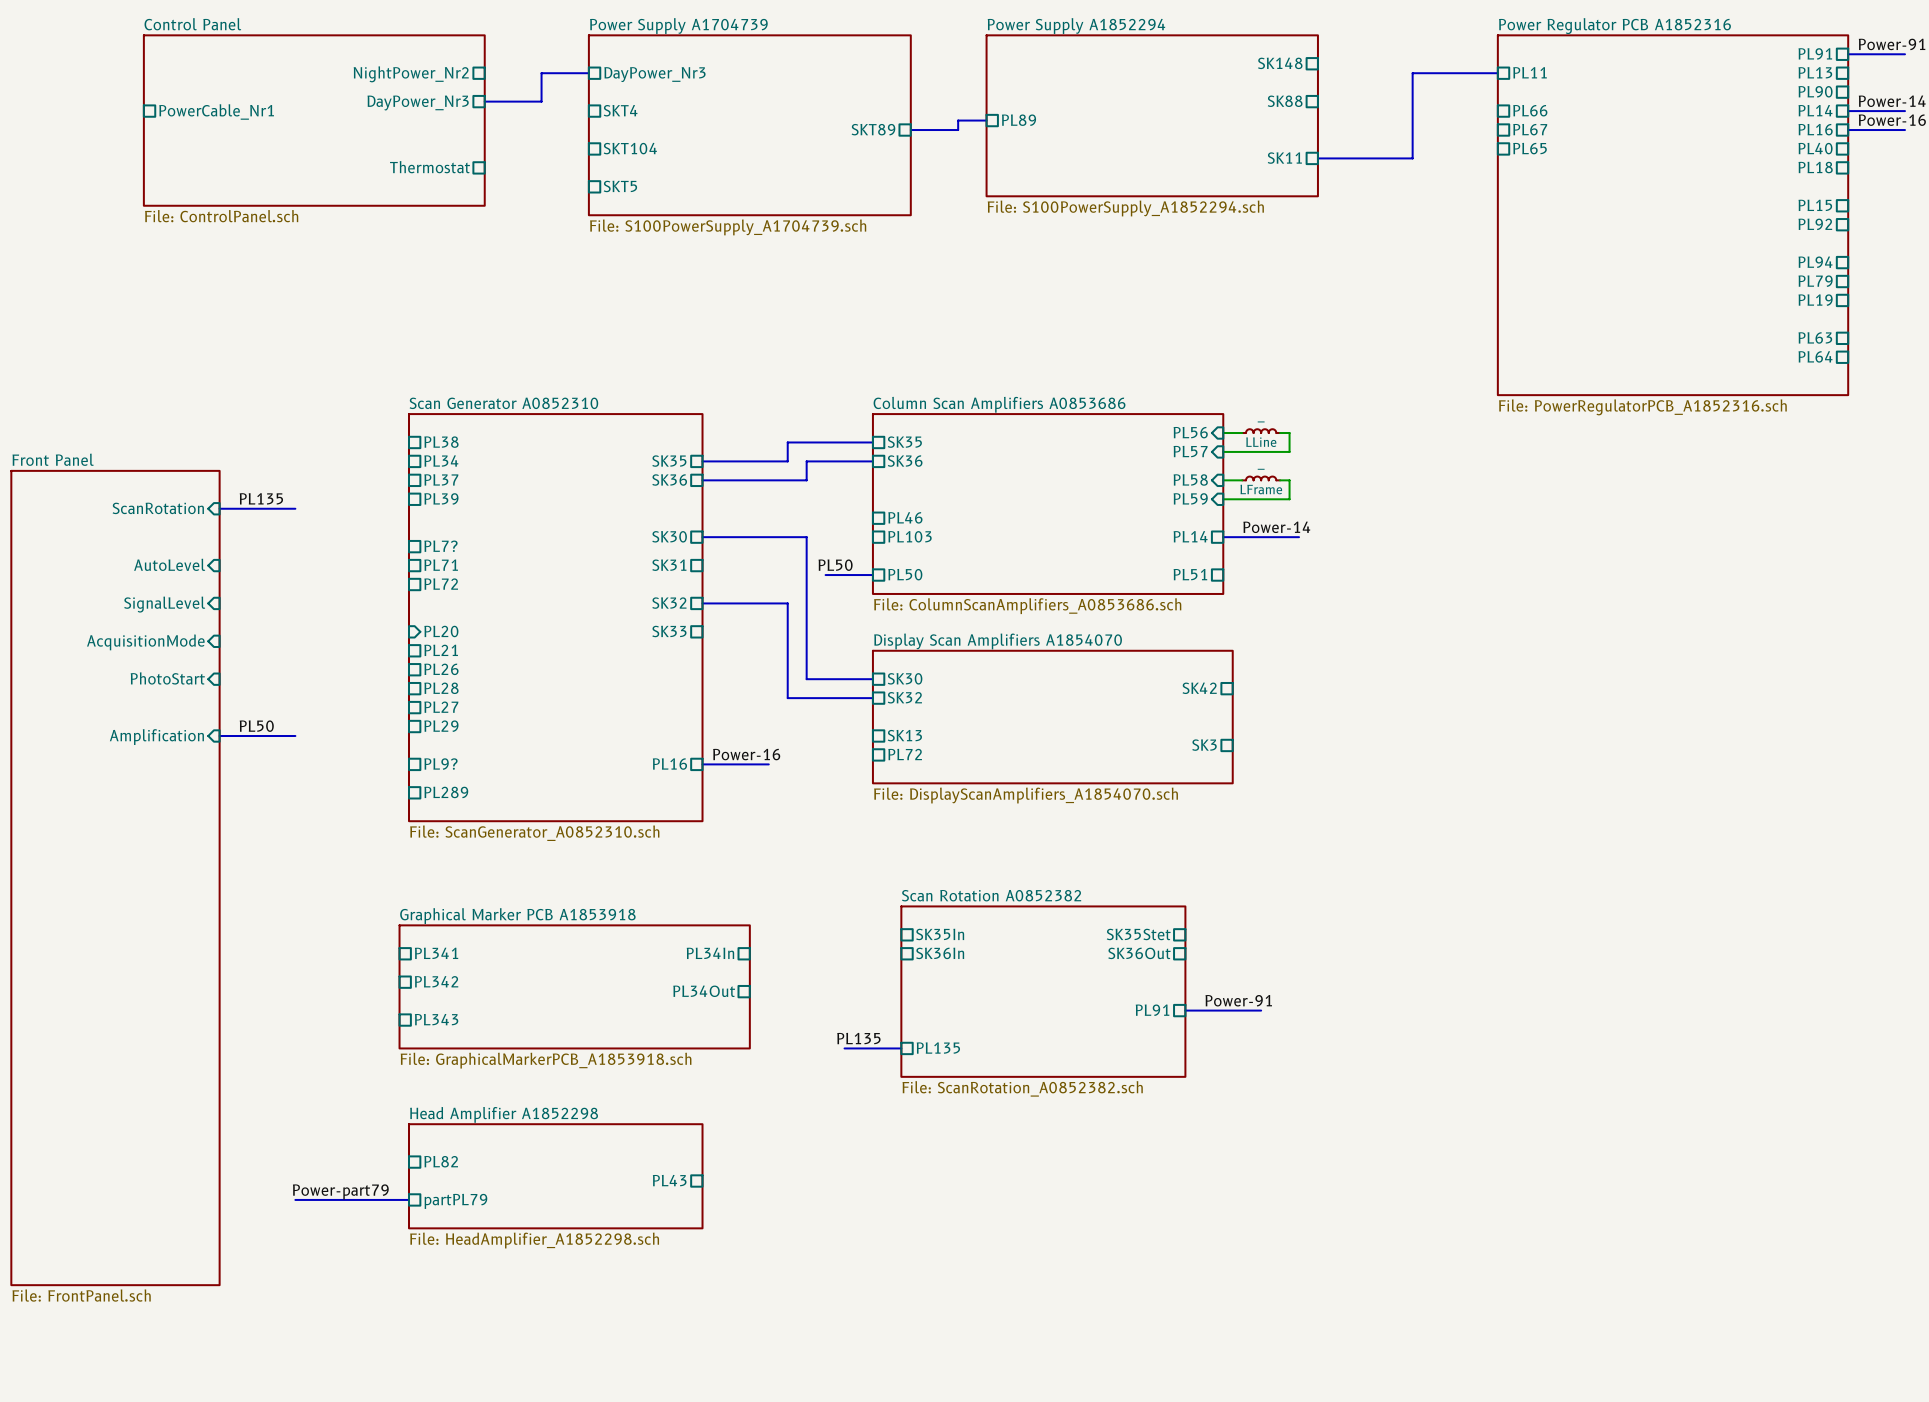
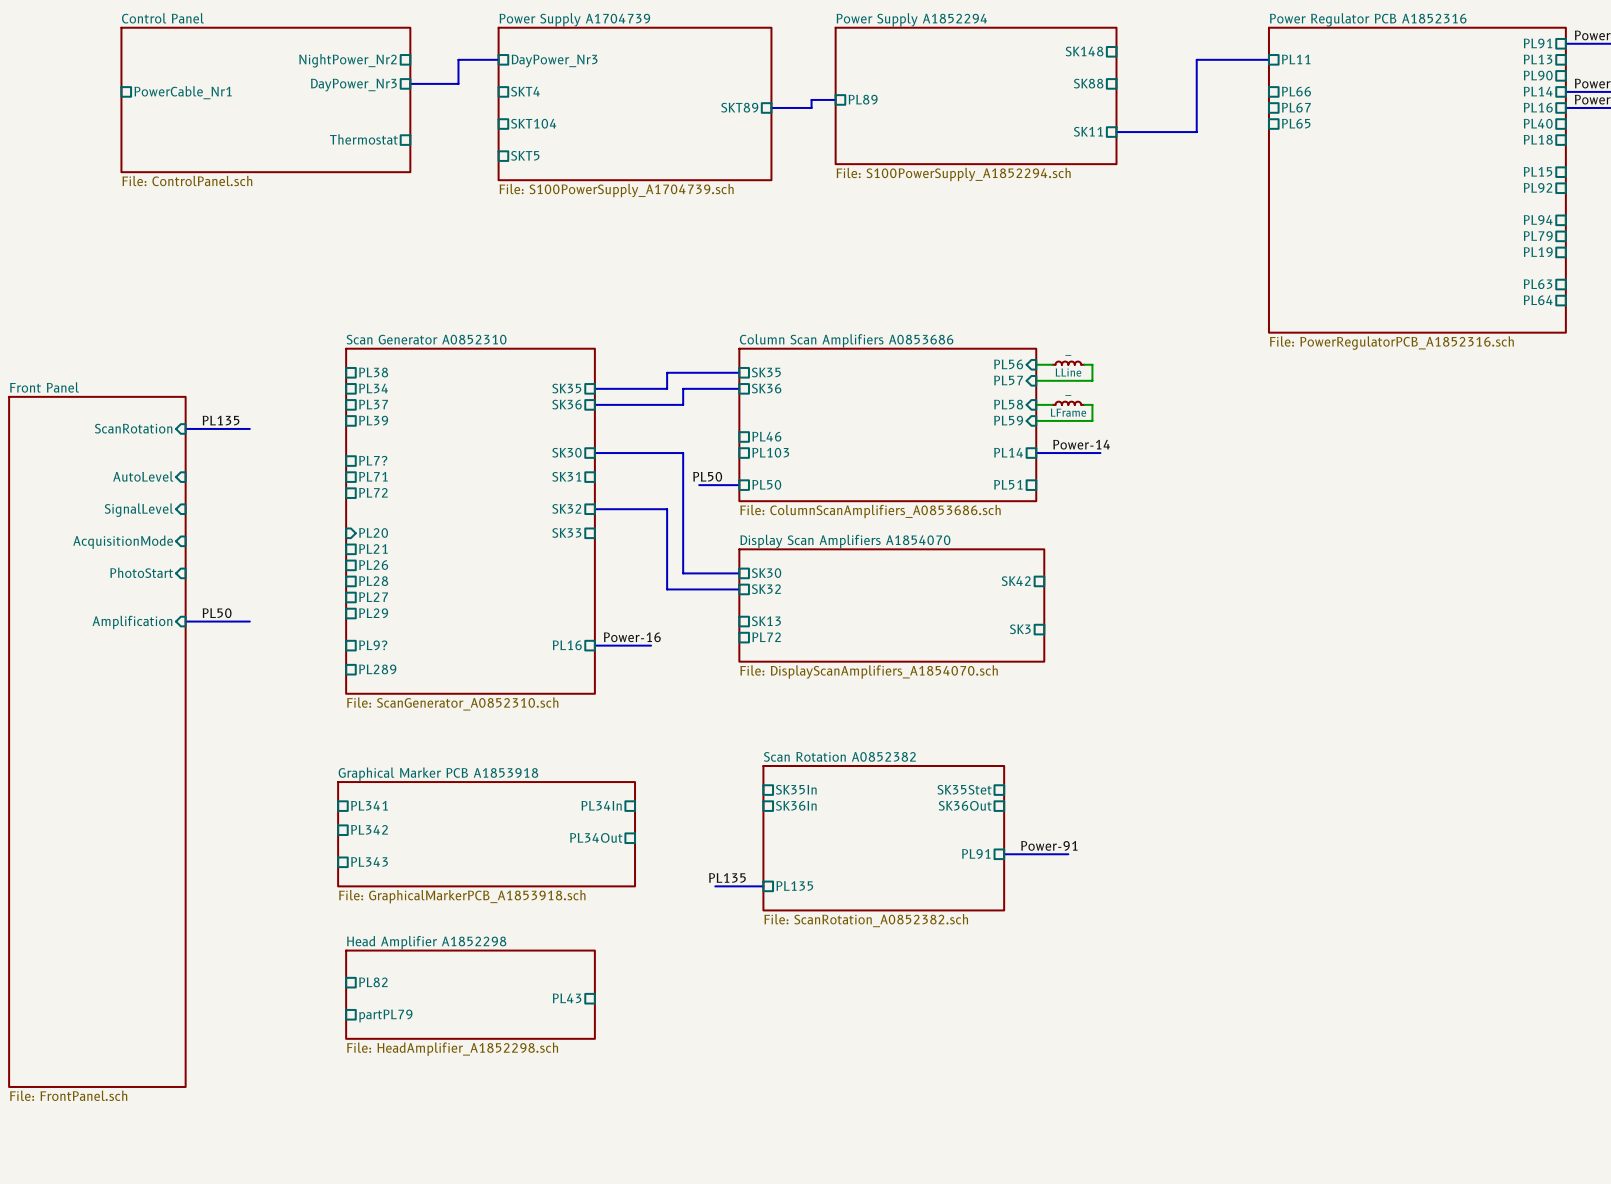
label: Power-part79 (340, 1191) -> none
bus: (295, 1199) (408, 1199) -> none

